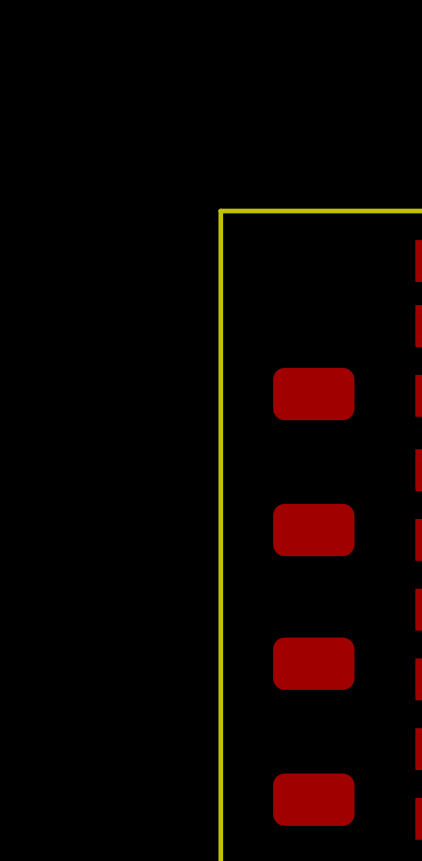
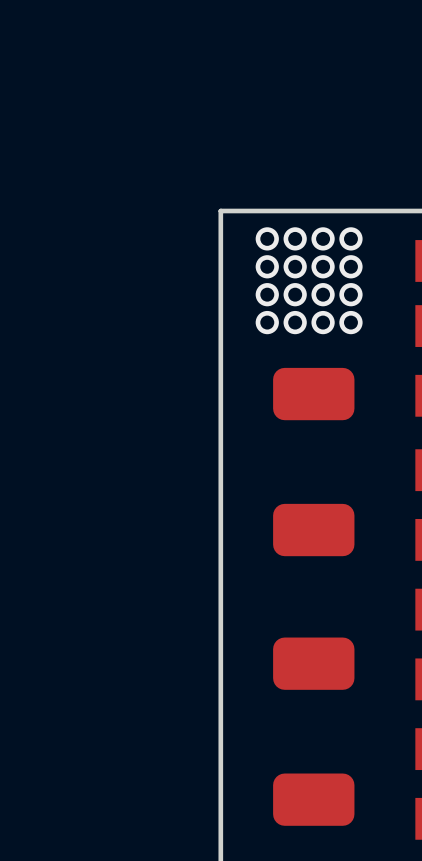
via: none -> (267, 238)
via: none -> (295, 238)
via: none -> (323, 238)
via: none -> (350, 238)
via: none -> (267, 266)
via: none -> (295, 266)
via: none -> (323, 266)
via: none -> (350, 266)
via: none -> (267, 294)
via: none -> (295, 294)
via: none -> (323, 294)
via: none -> (350, 294)
via: none -> (267, 322)
via: none -> (295, 322)
via: none -> (323, 322)
via: none -> (350, 322)

